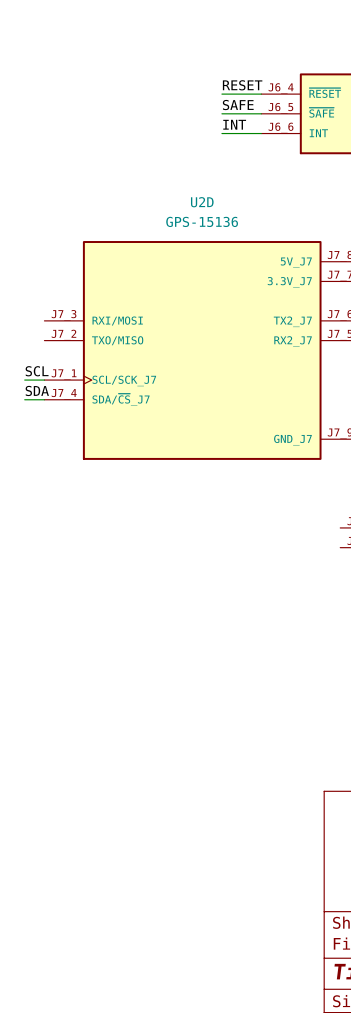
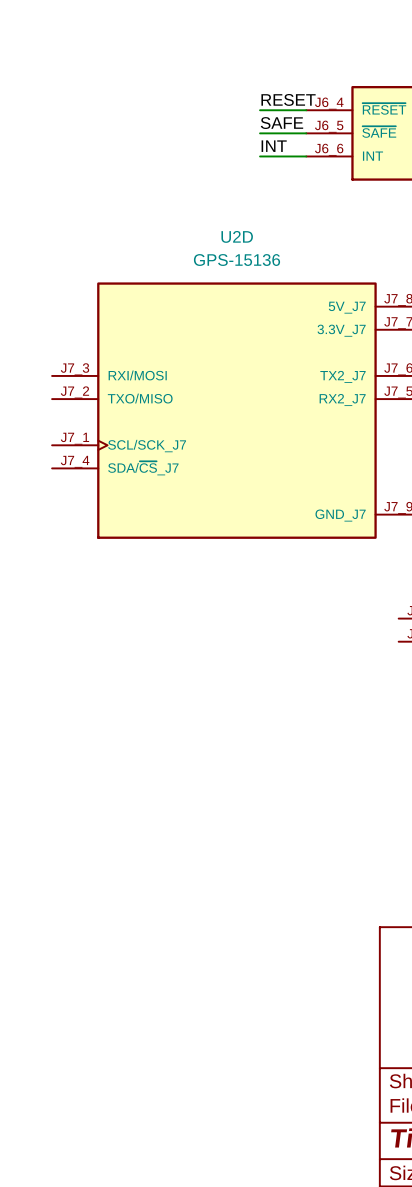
label: SCL (37, 371) -> none
wire: (24, 380) (44, 380) -> none
label: SDA (37, 390) -> none
wire: (24, 399) (44, 399) -> none

